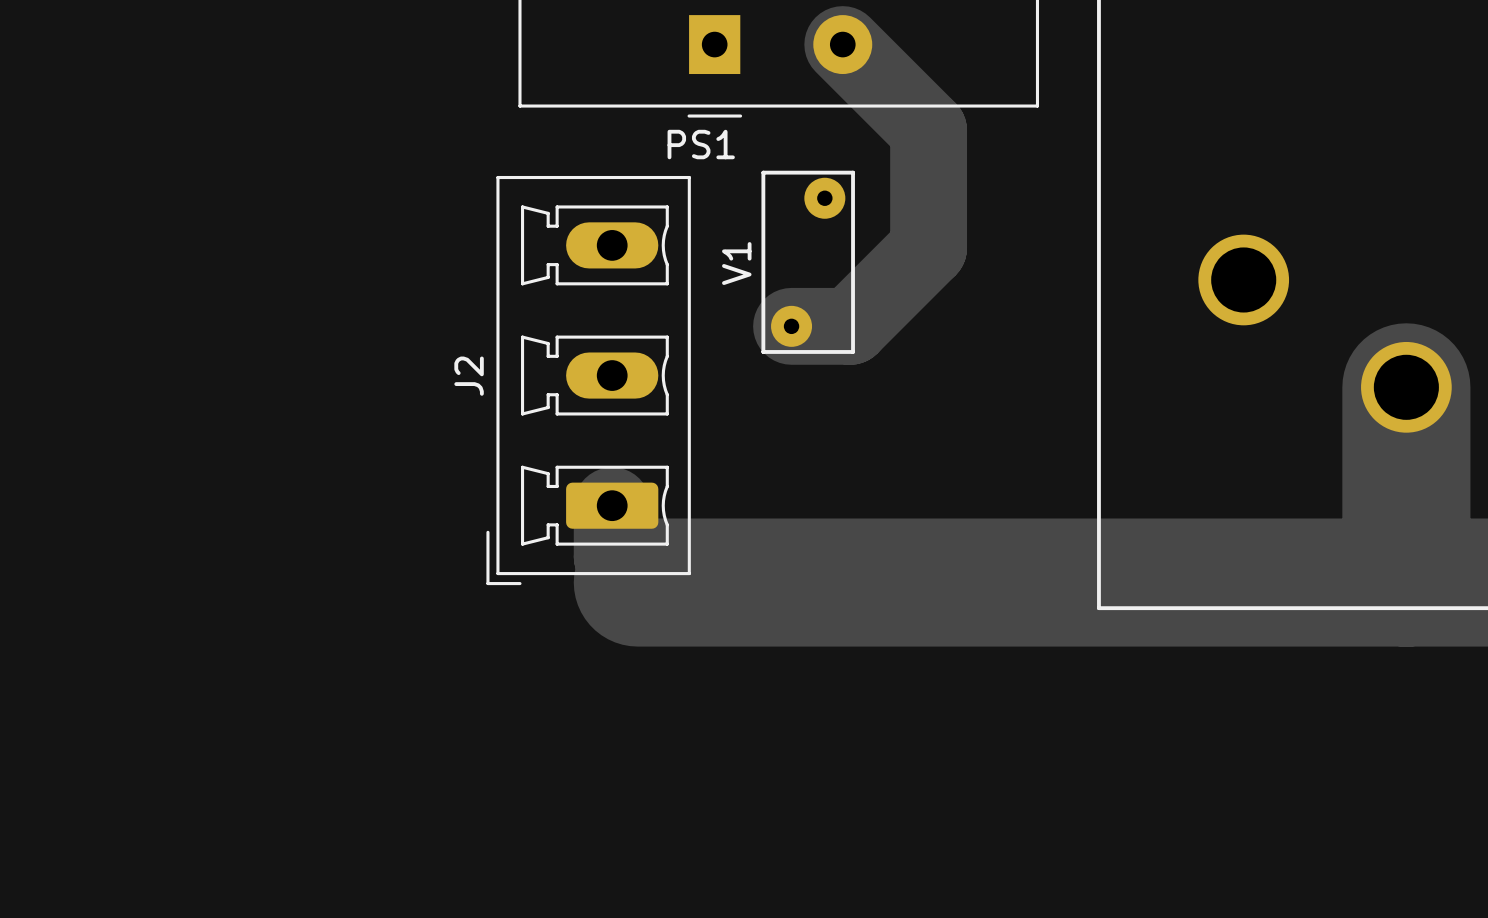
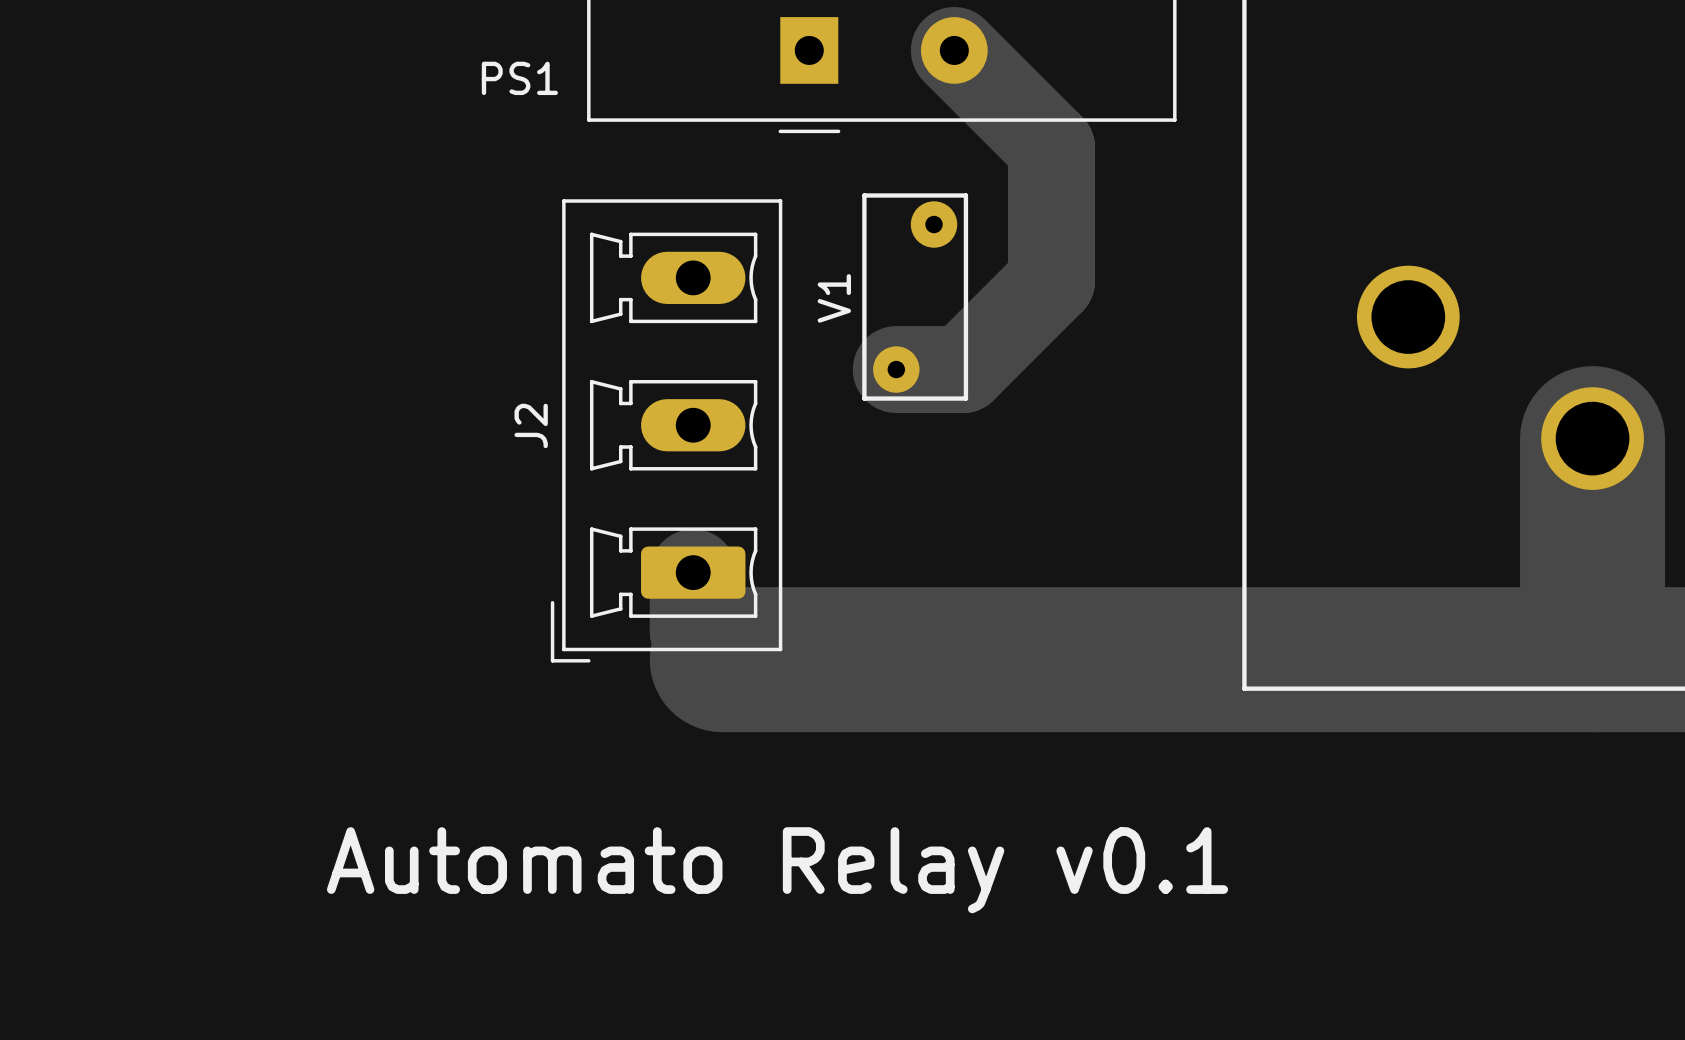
PS1 name position: PS1 (701, 144) -> PS1 (519, 78)
text: none -> Automato Relay v0.1 (777, 870)

